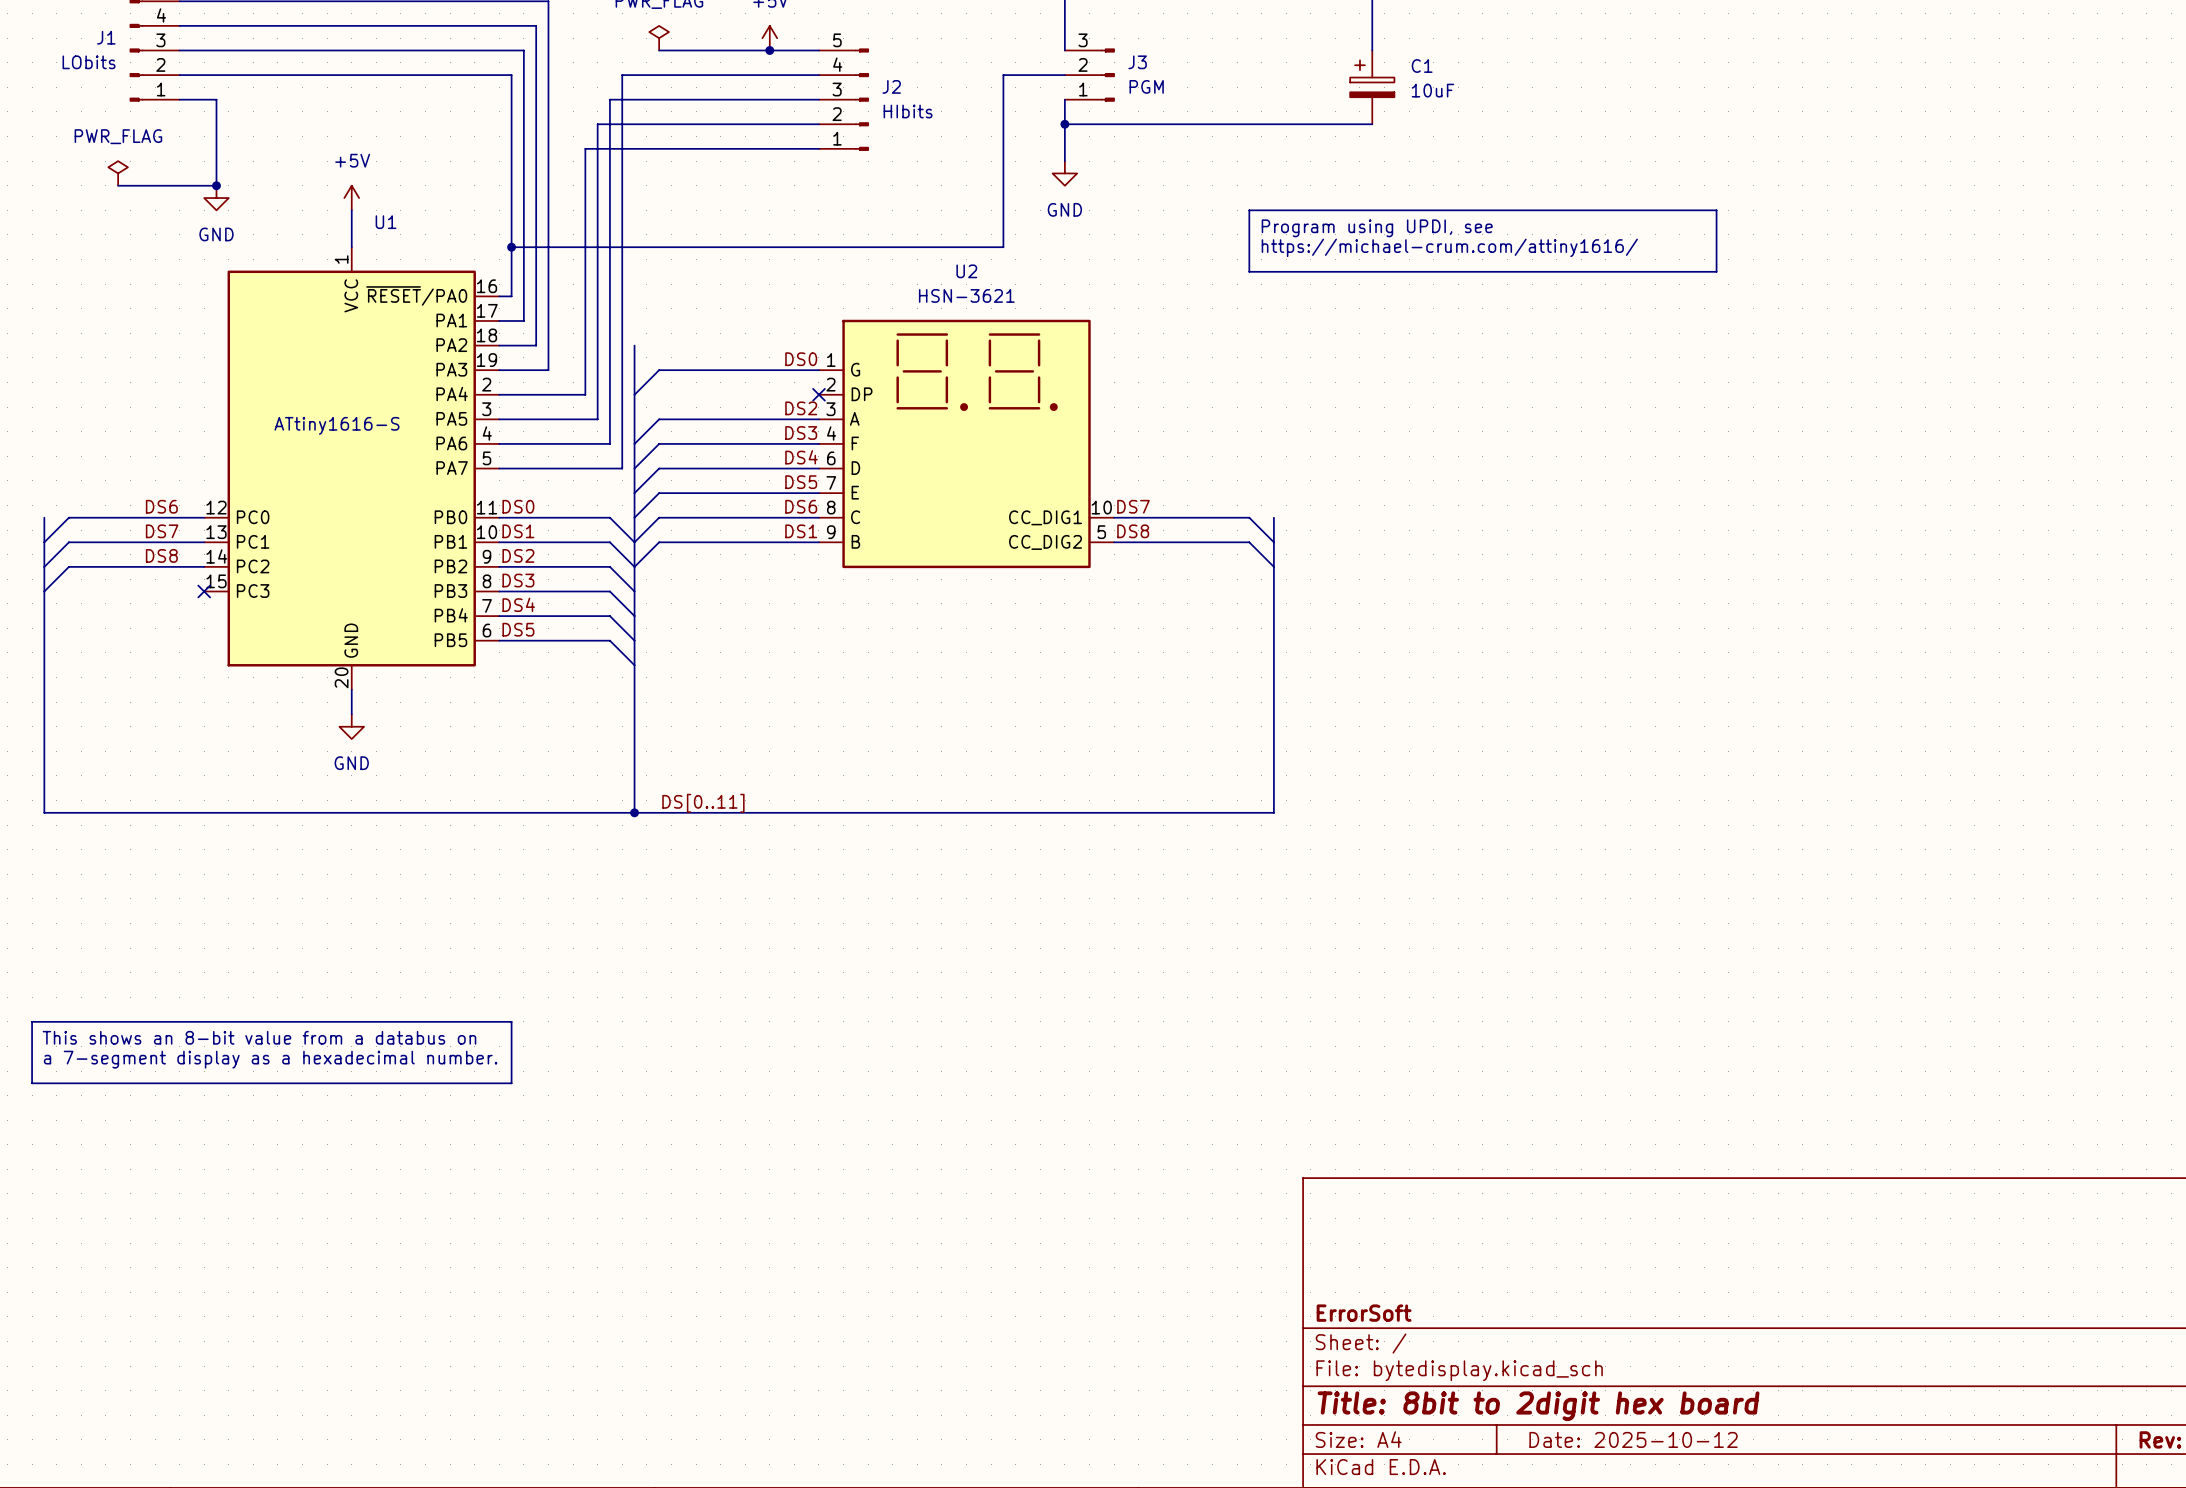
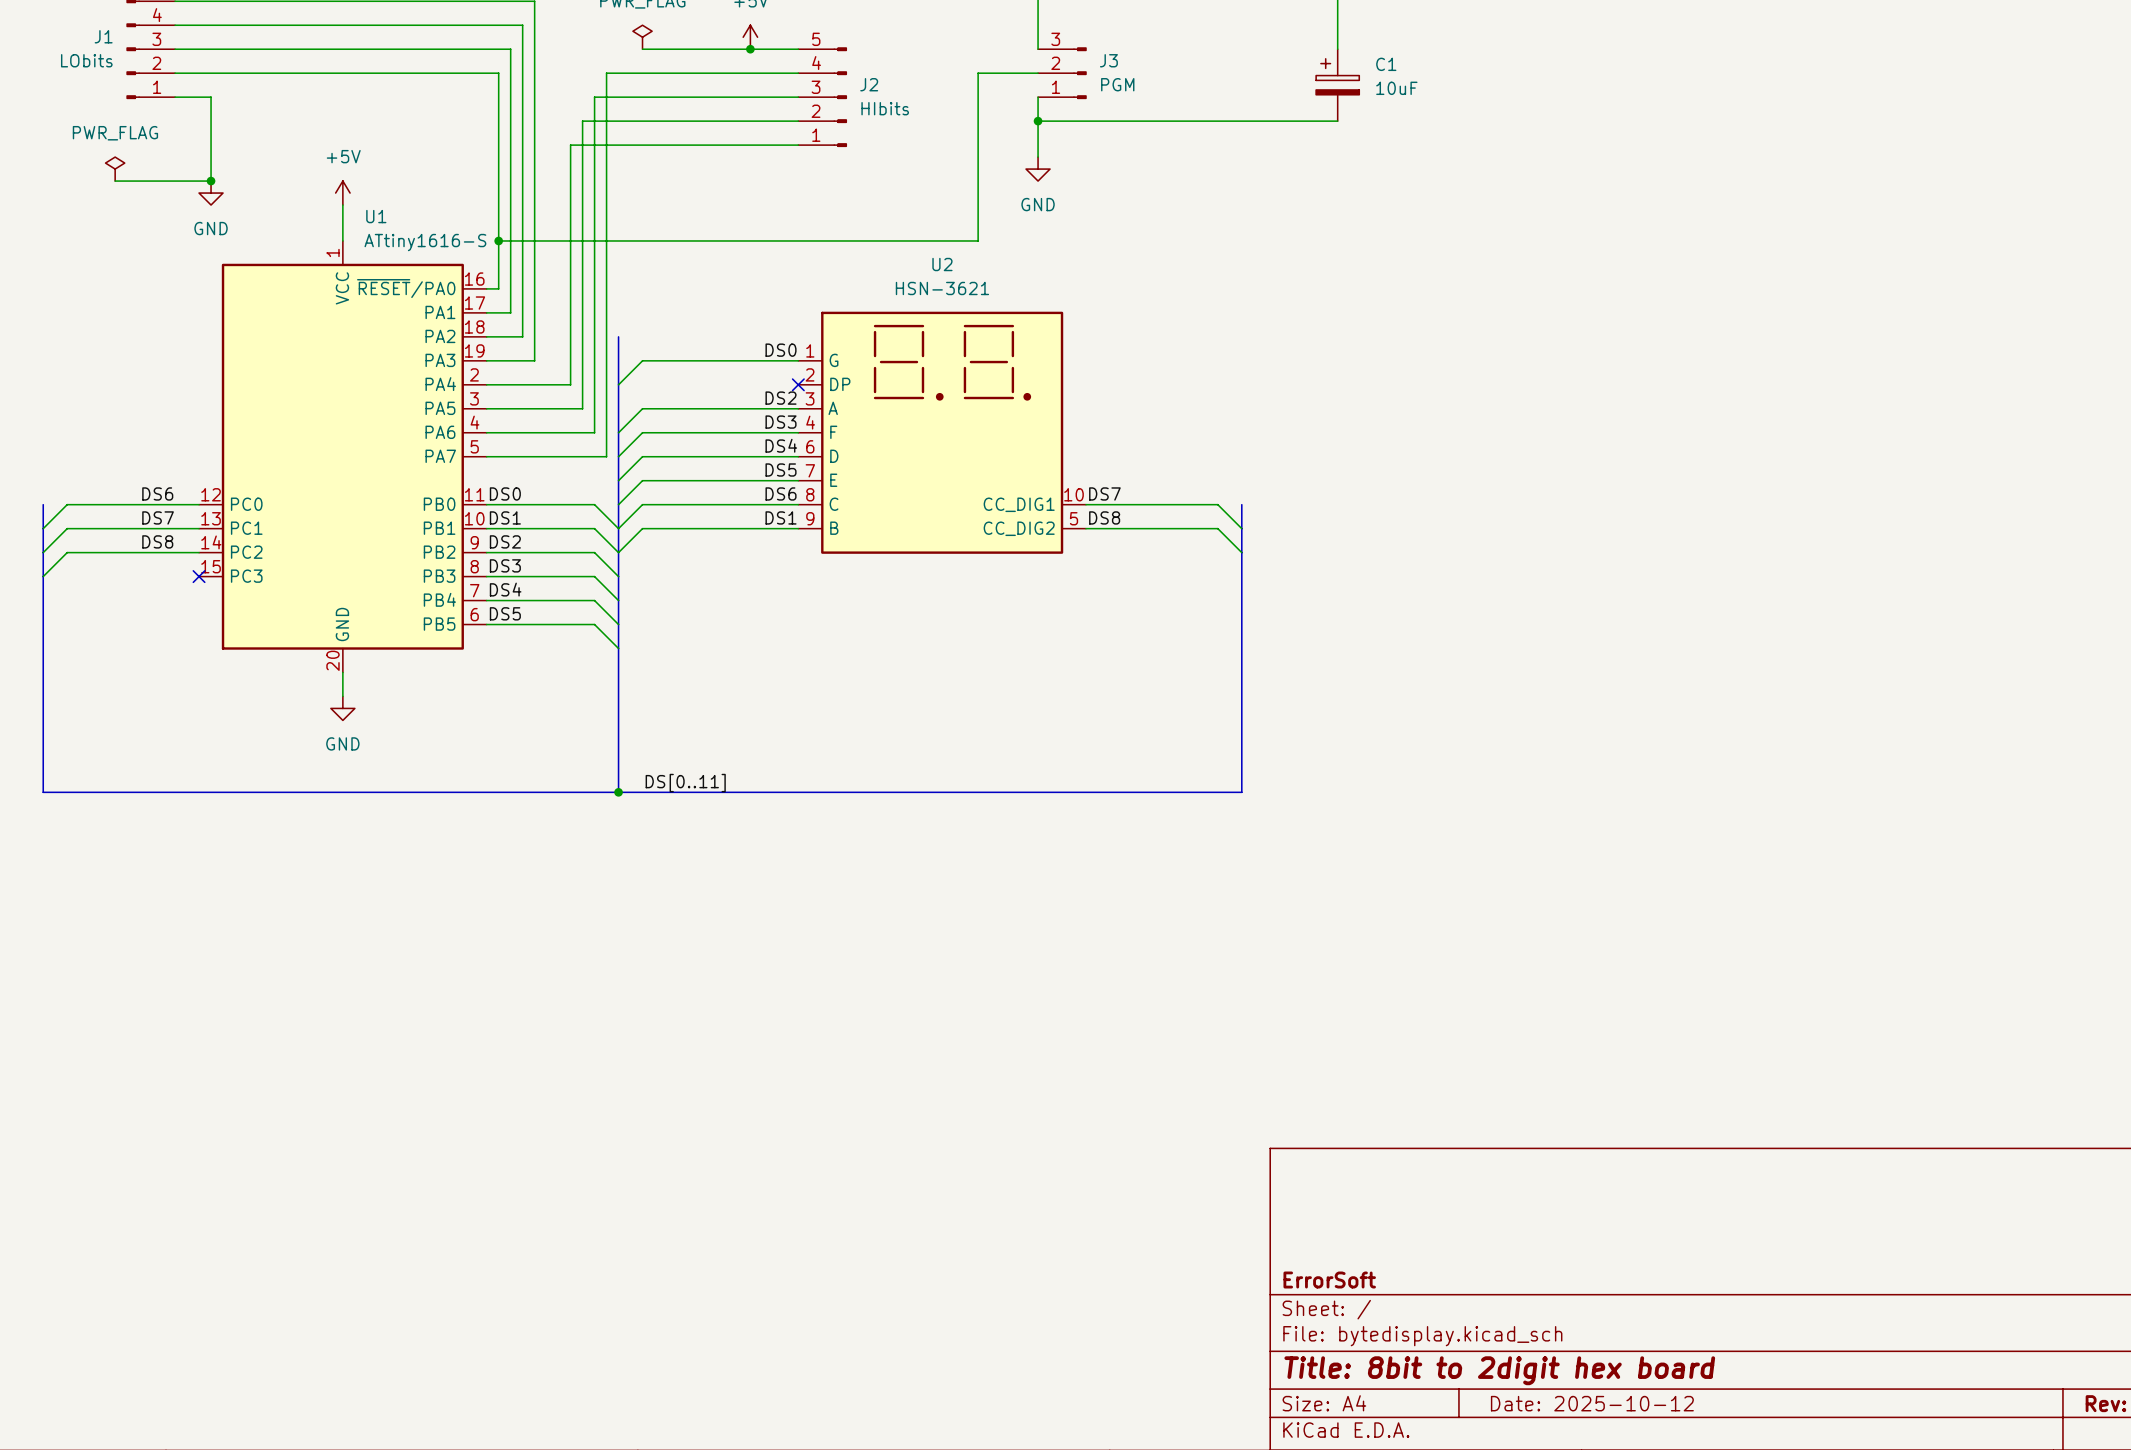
line: (1249, 210) (1716, 210) (1716, 271) (1249, 271) (1249, 210) -> none
text: Program using UPDI, see (1377, 228) -> none
text: https://michael-crum.com/attiny1616/ (1449, 247) -> none
U1 value position: ATtiny1616-S (336, 425) -> ATtiny1616-S (425, 242)
line: (32, 1021) (511, 1021) (511, 1083) (32, 1083) (32, 1021) -> none
text: This shows an 8-bit value from a databus on (259, 1037) -> none
text: a 7-segment display as a hexadecimal number. (270, 1059) -> none

